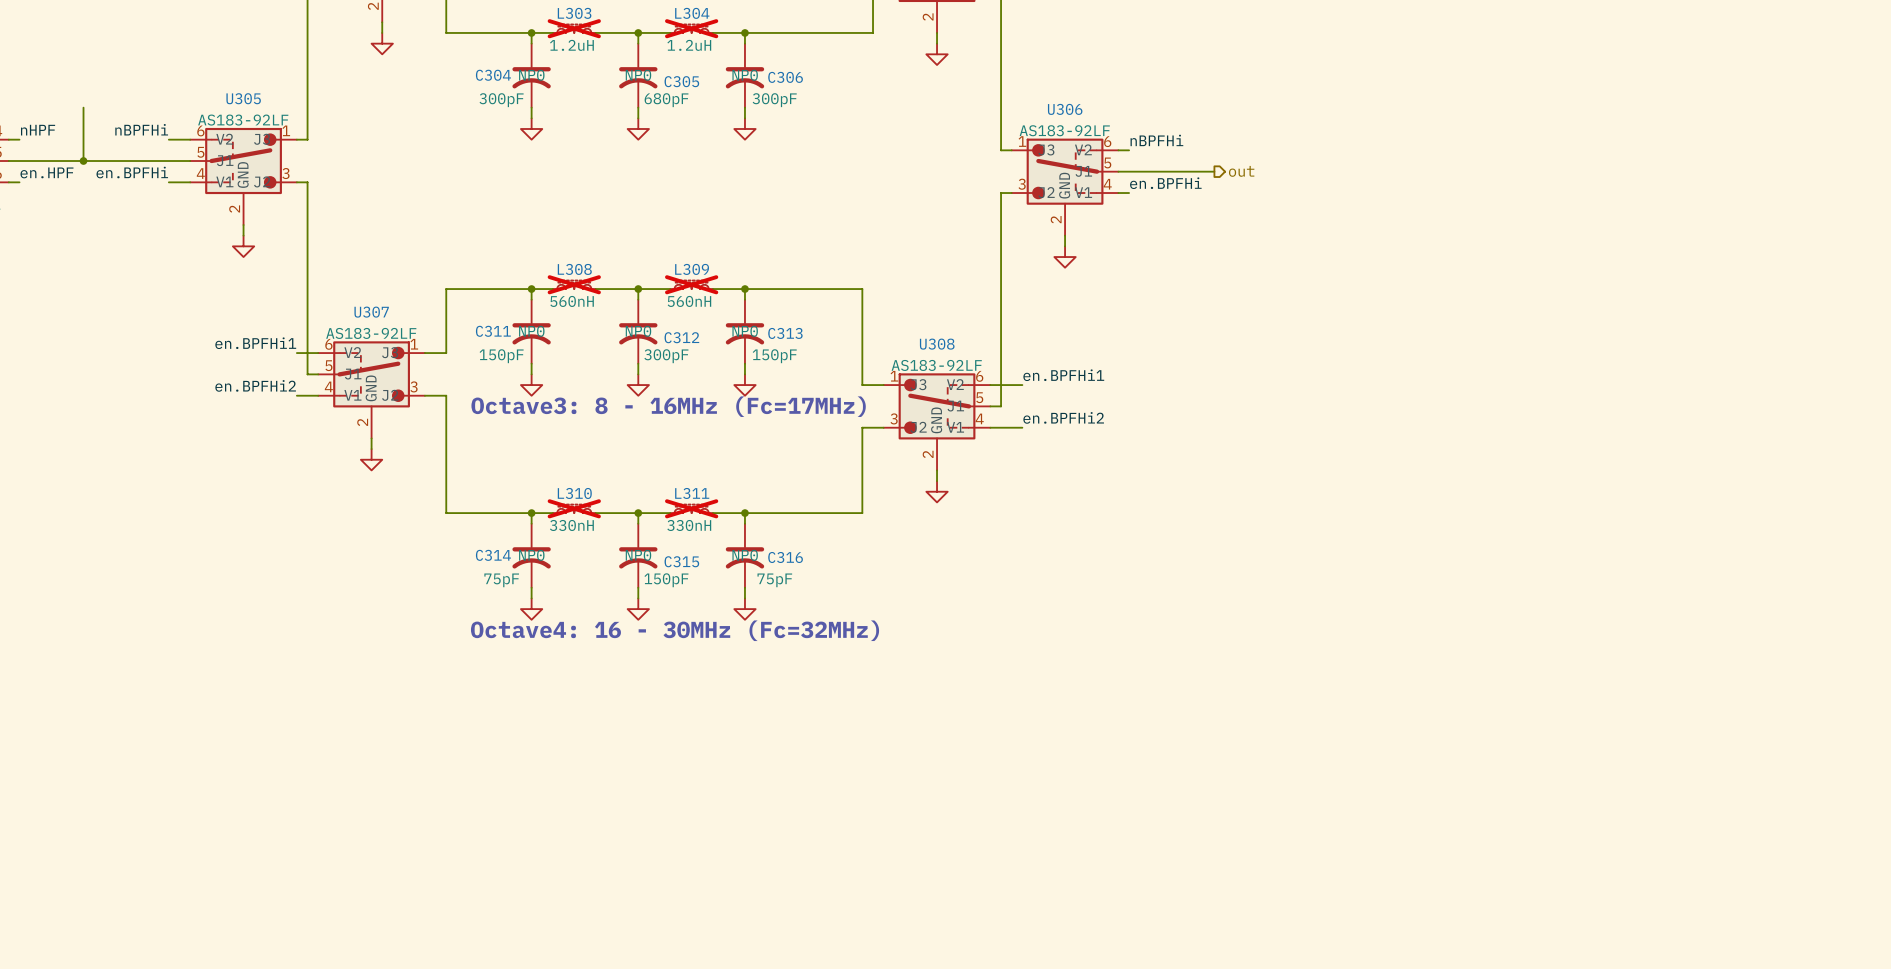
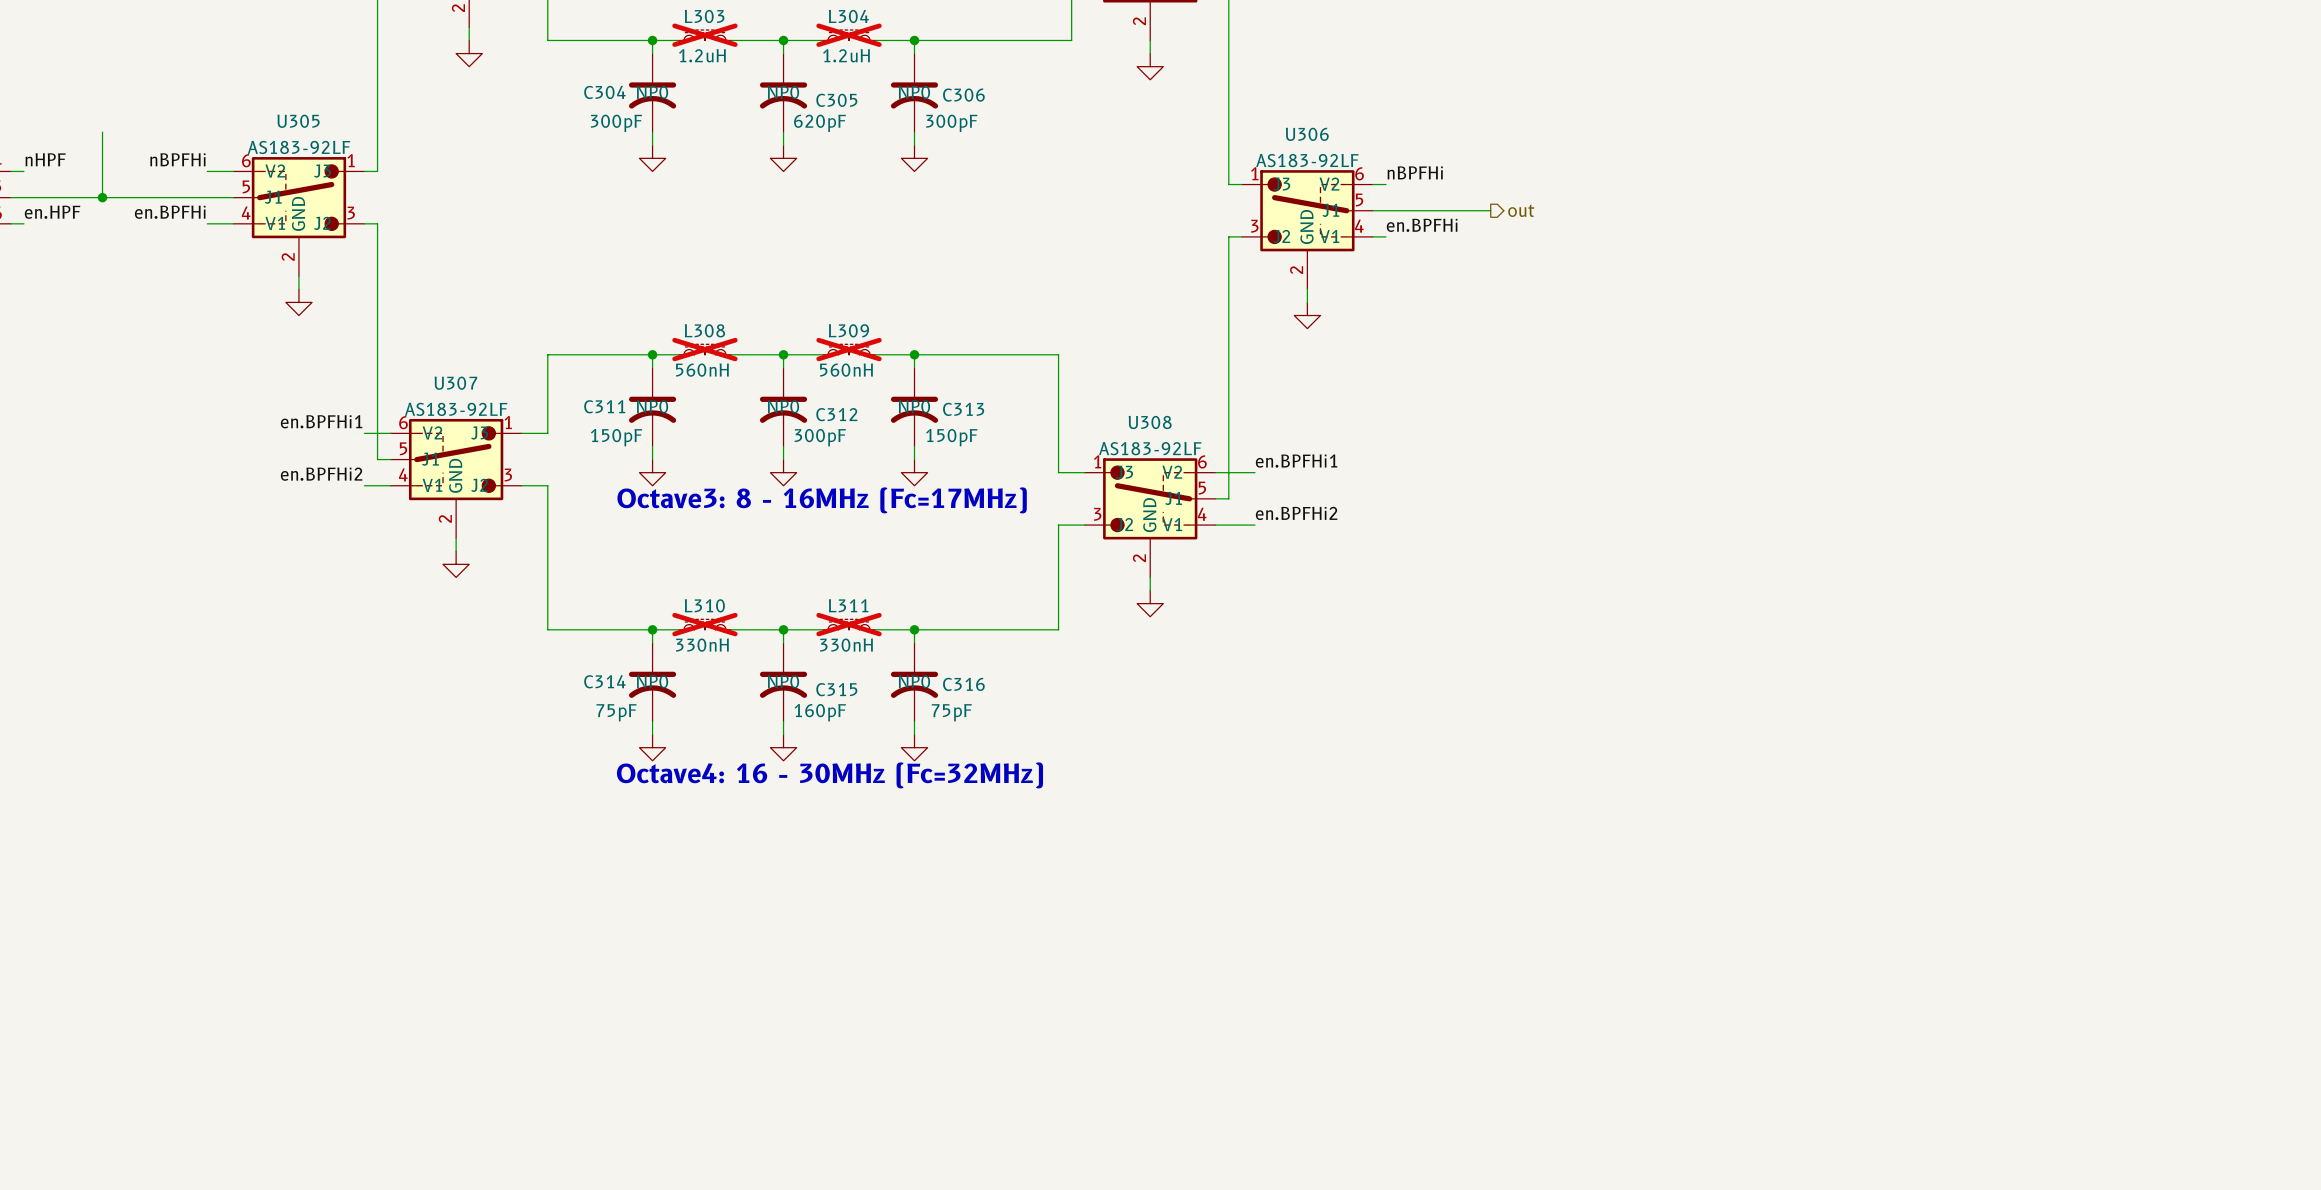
C305 value: 680pF (666, 100) -> 620pF (819, 123)
C315 value: 150pF (666, 580) -> 160pF (820, 712)

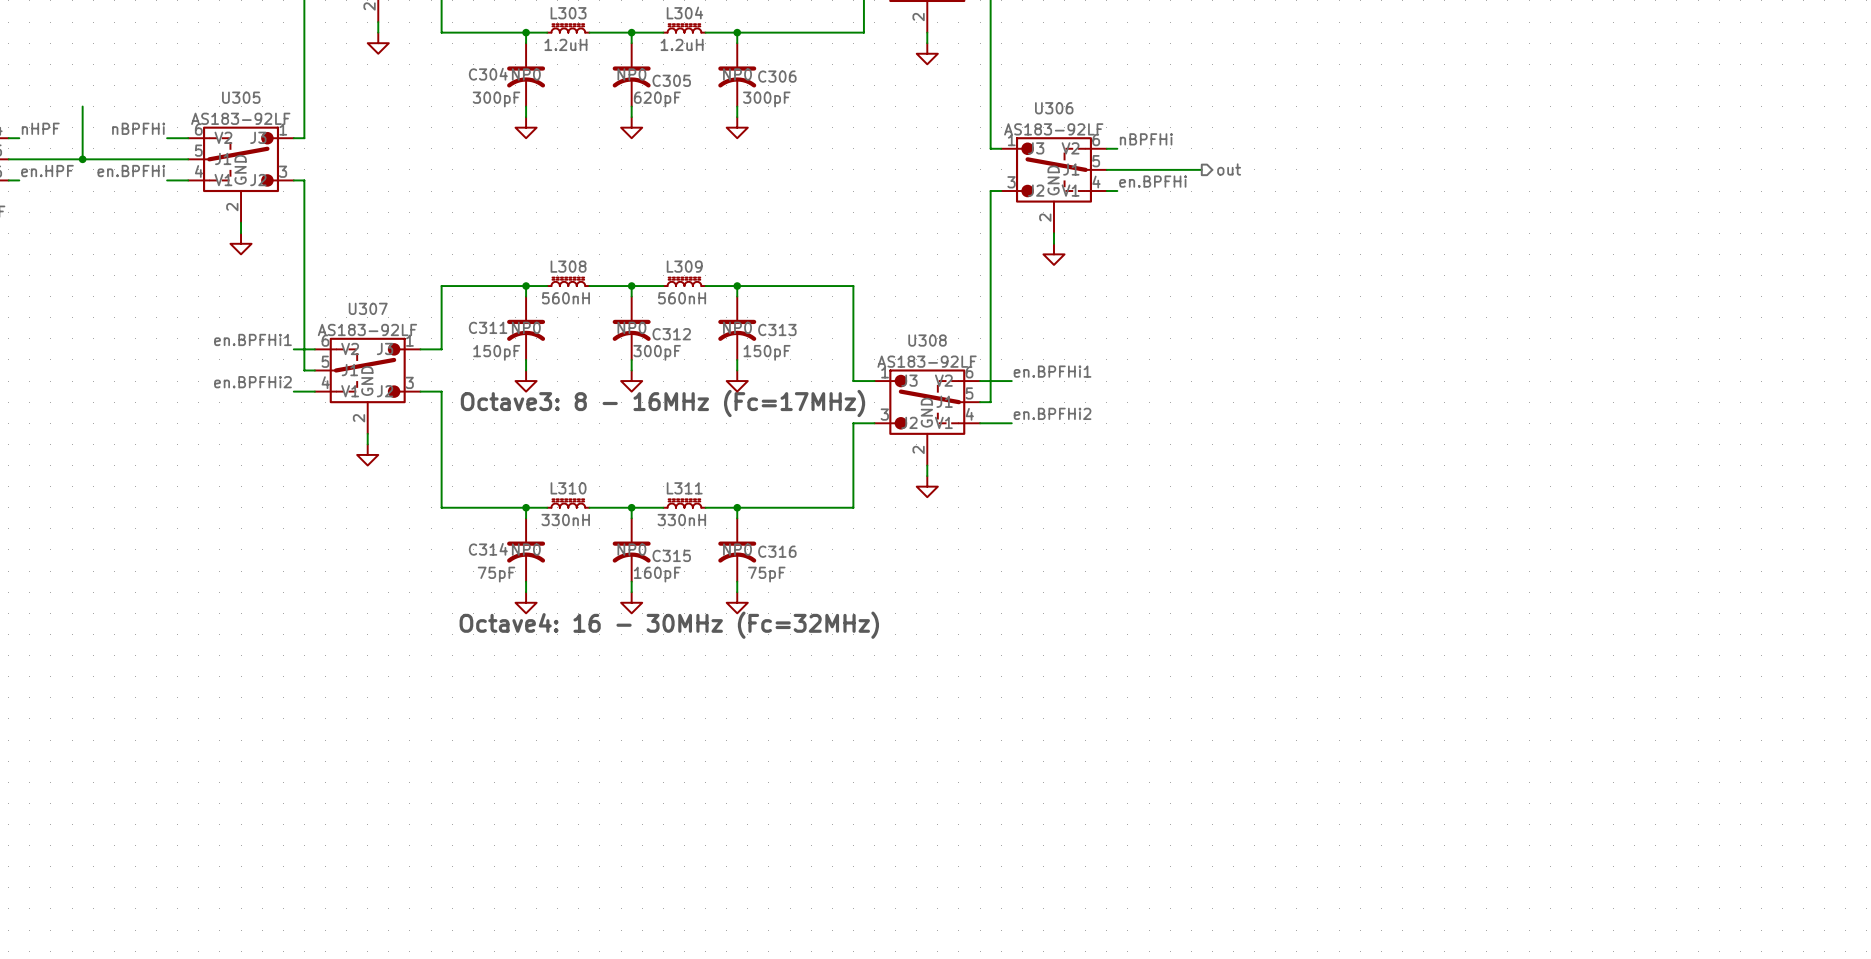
L303 do-not-place cross: (704, 35) -> none
L304 do-not-place cross: (849, 35) -> none
L308 do-not-place cross: (704, 349) -> none
L309 do-not-place cross: (849, 349) -> none
L310 do-not-place cross: (704, 624) -> none
L311 do-not-place cross: (849, 624) -> none

